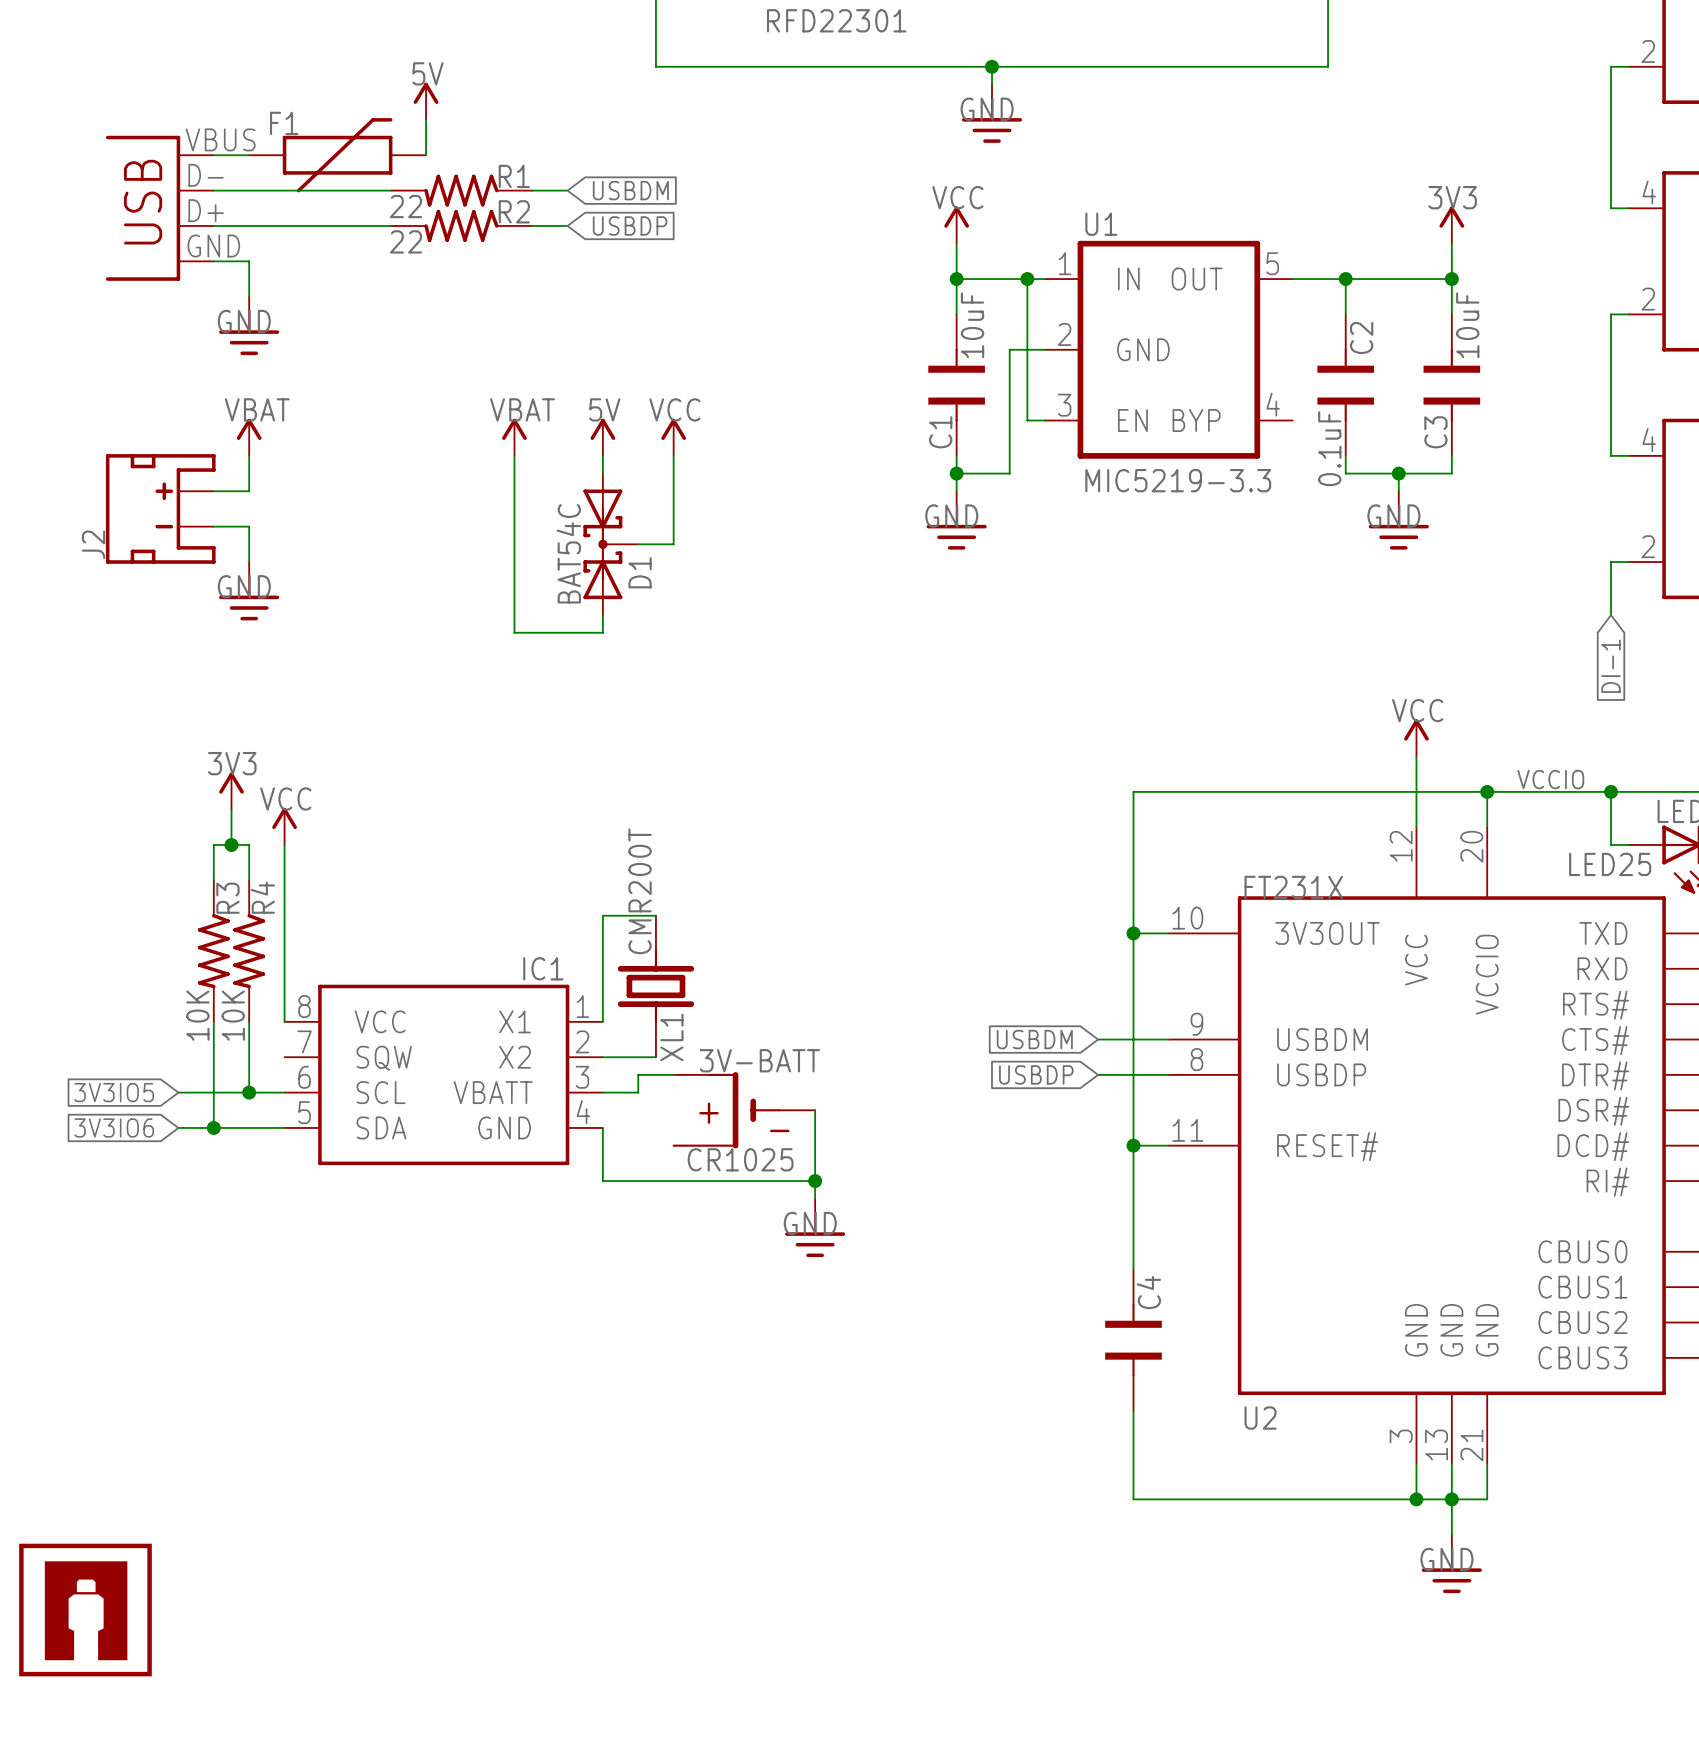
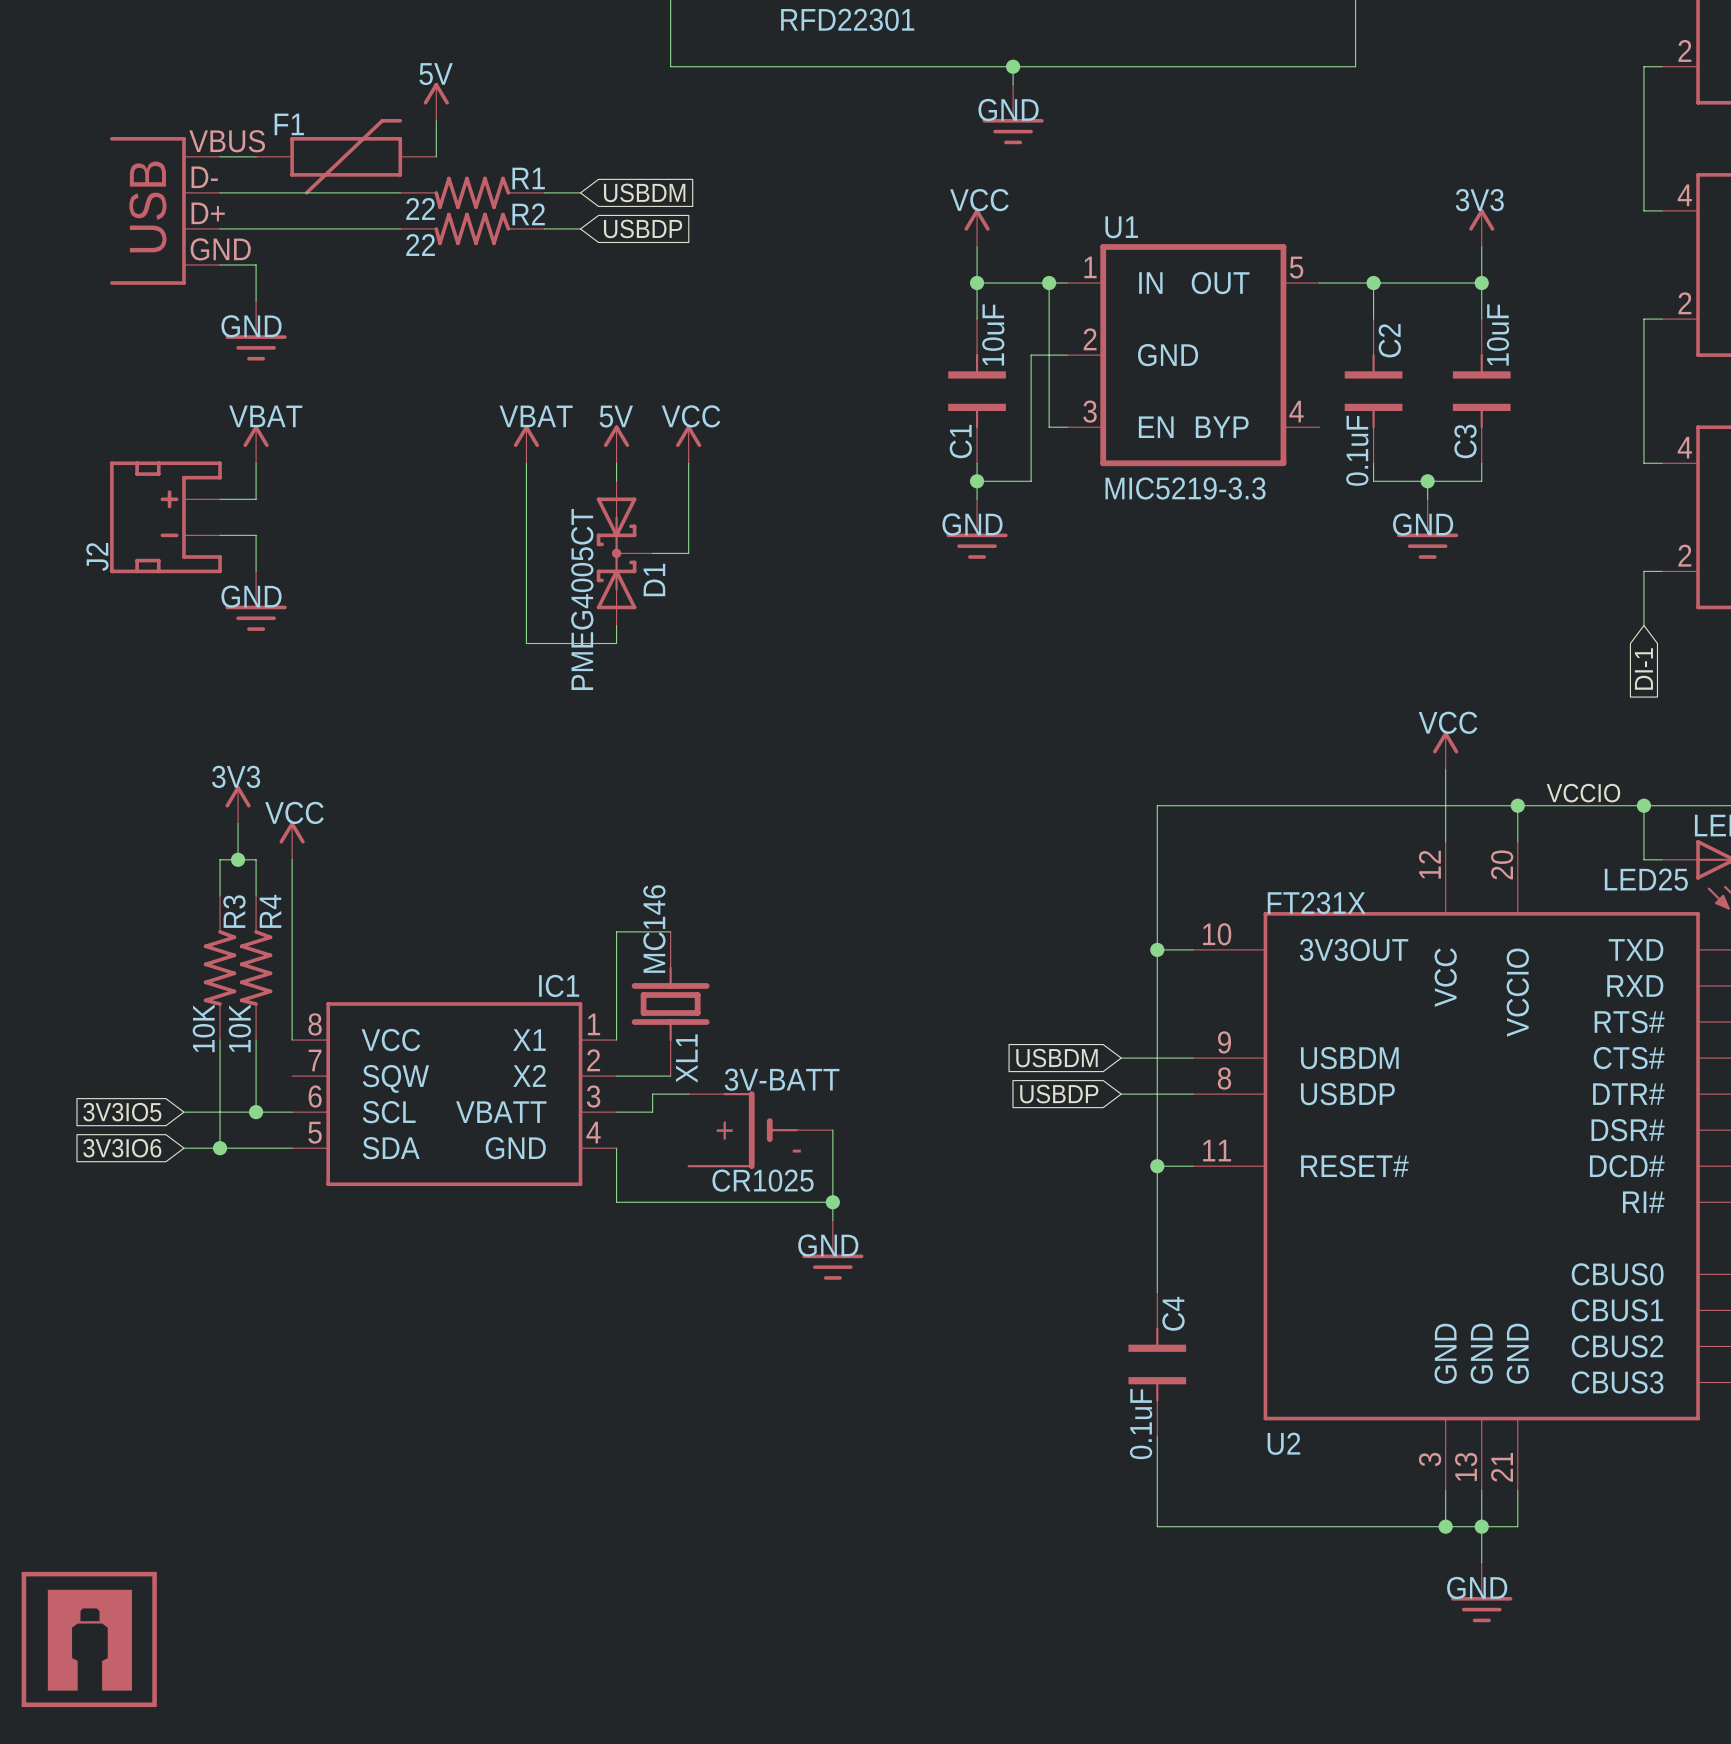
D1 text: BAT54C (568, 553) -> none
D1 value: none -> PMEG4005CT (582, 599)
XL1 value: CMR200T (640, 891) -> MC146 (654, 929)
C4 value: none -> 0.1uF (1141, 1424)

